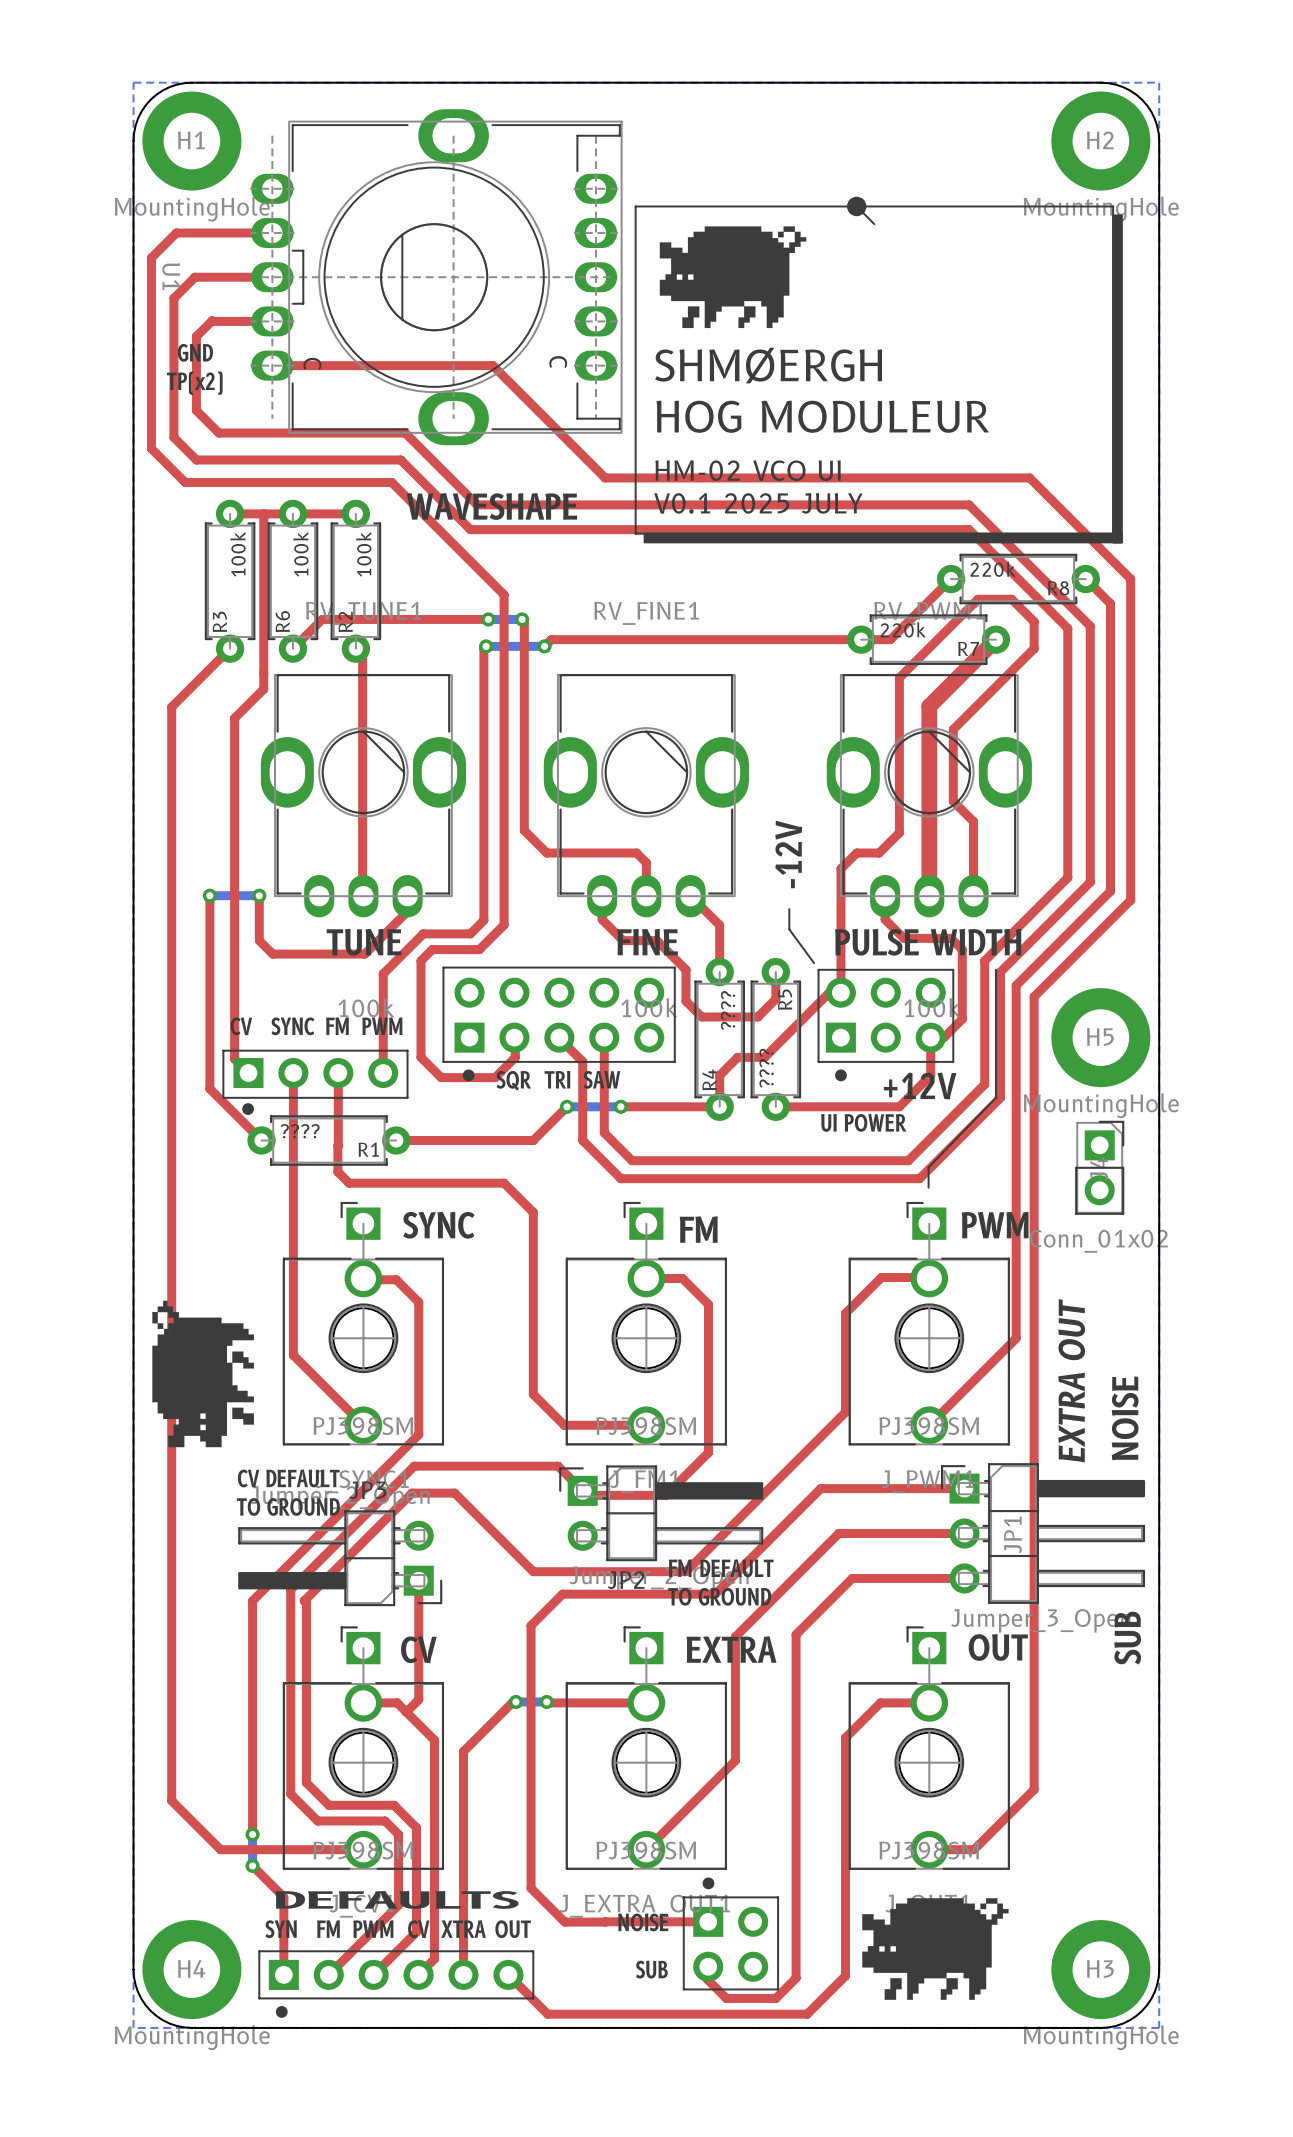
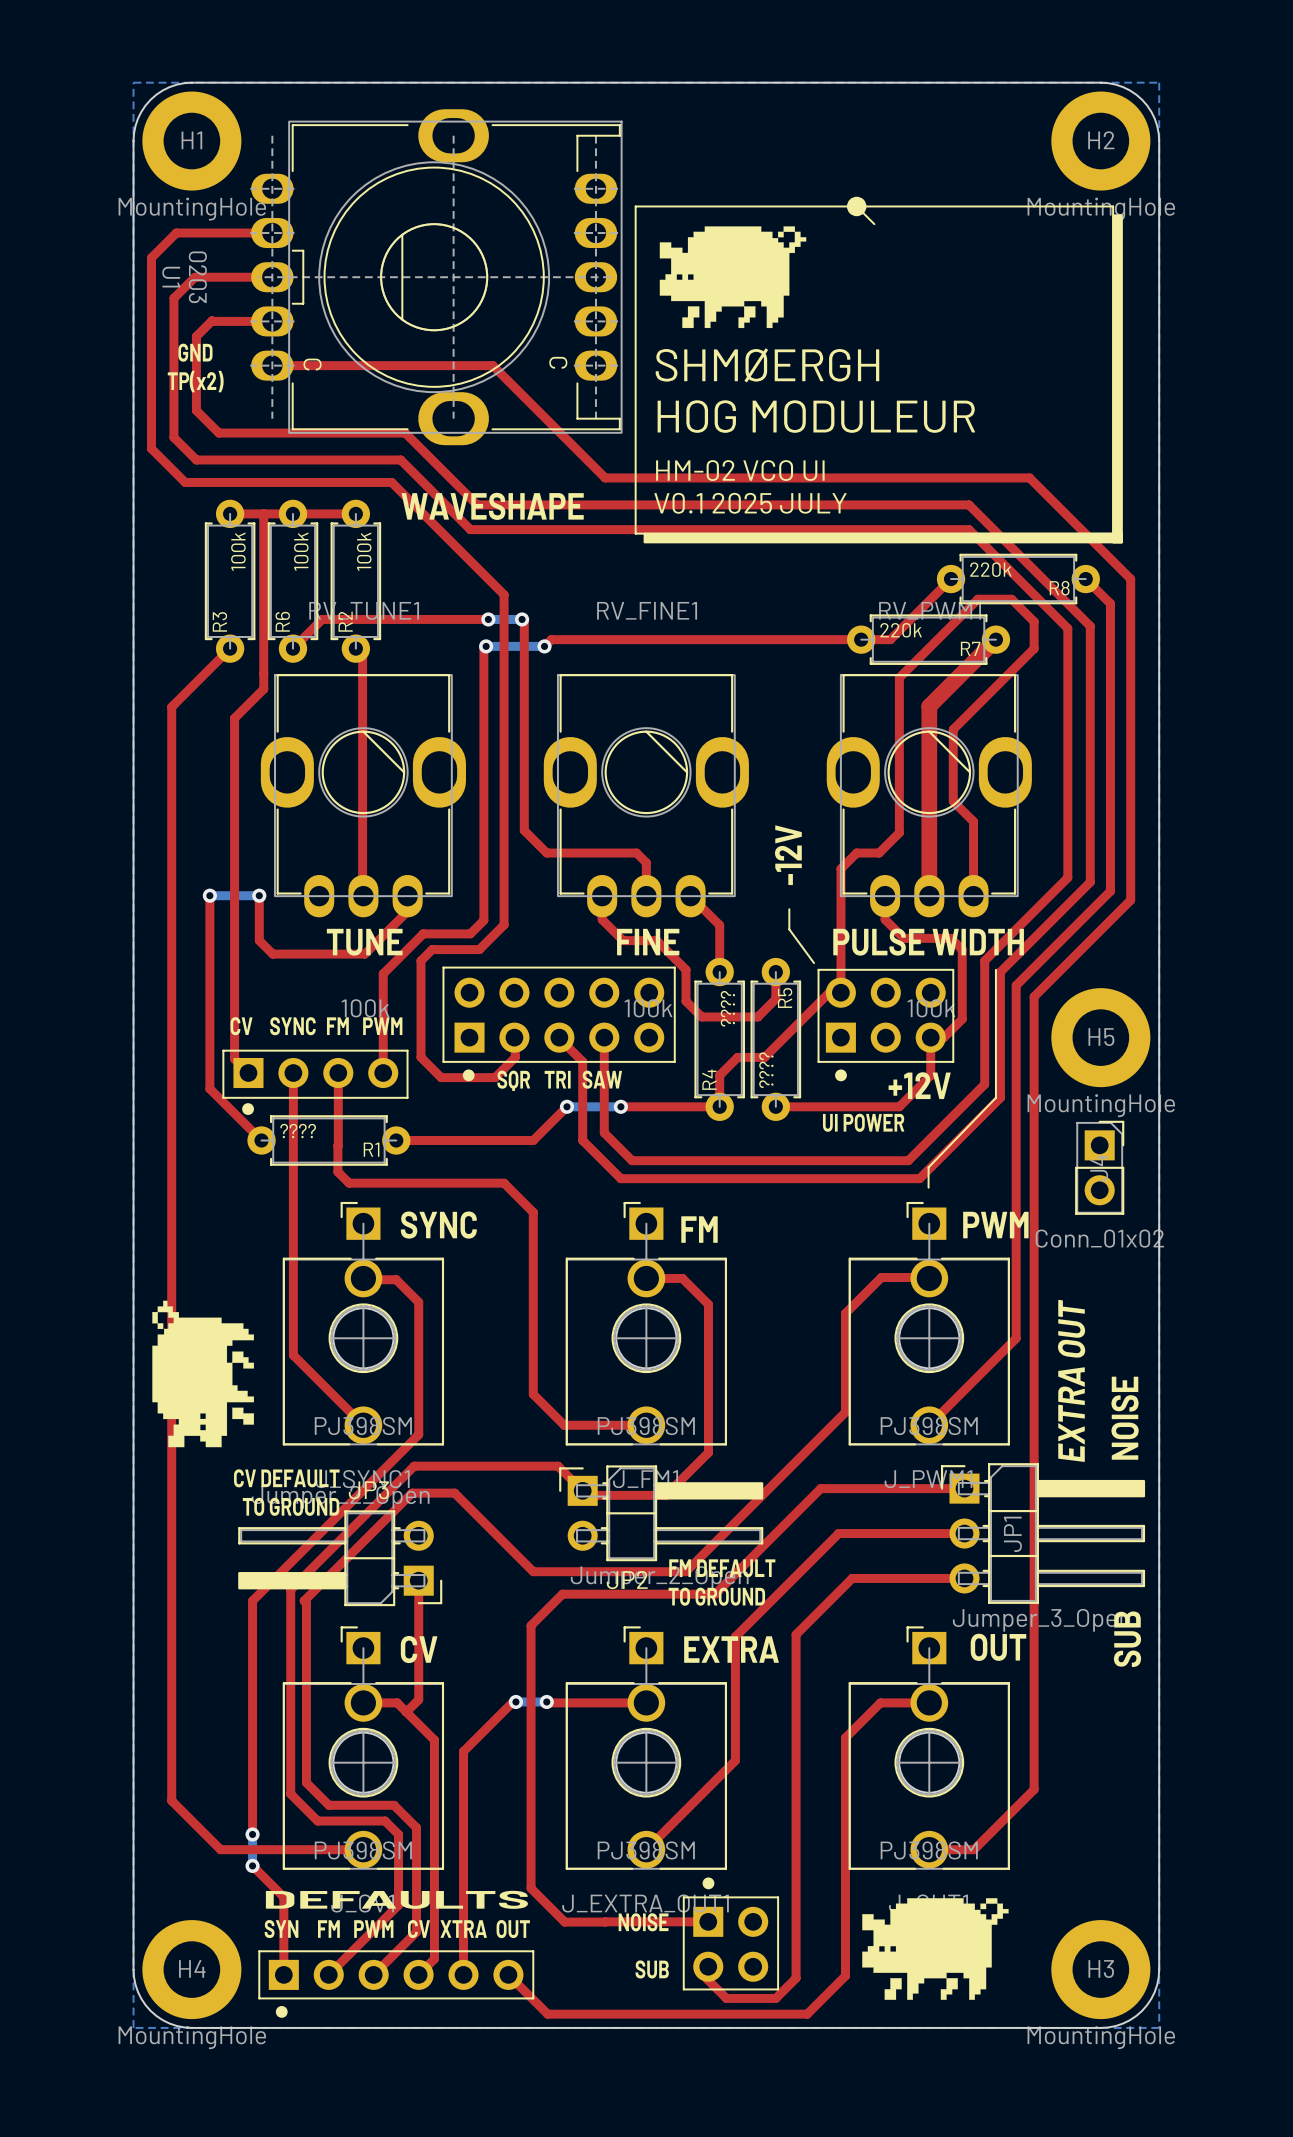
U1 value: none -> 0203 (197, 277)

